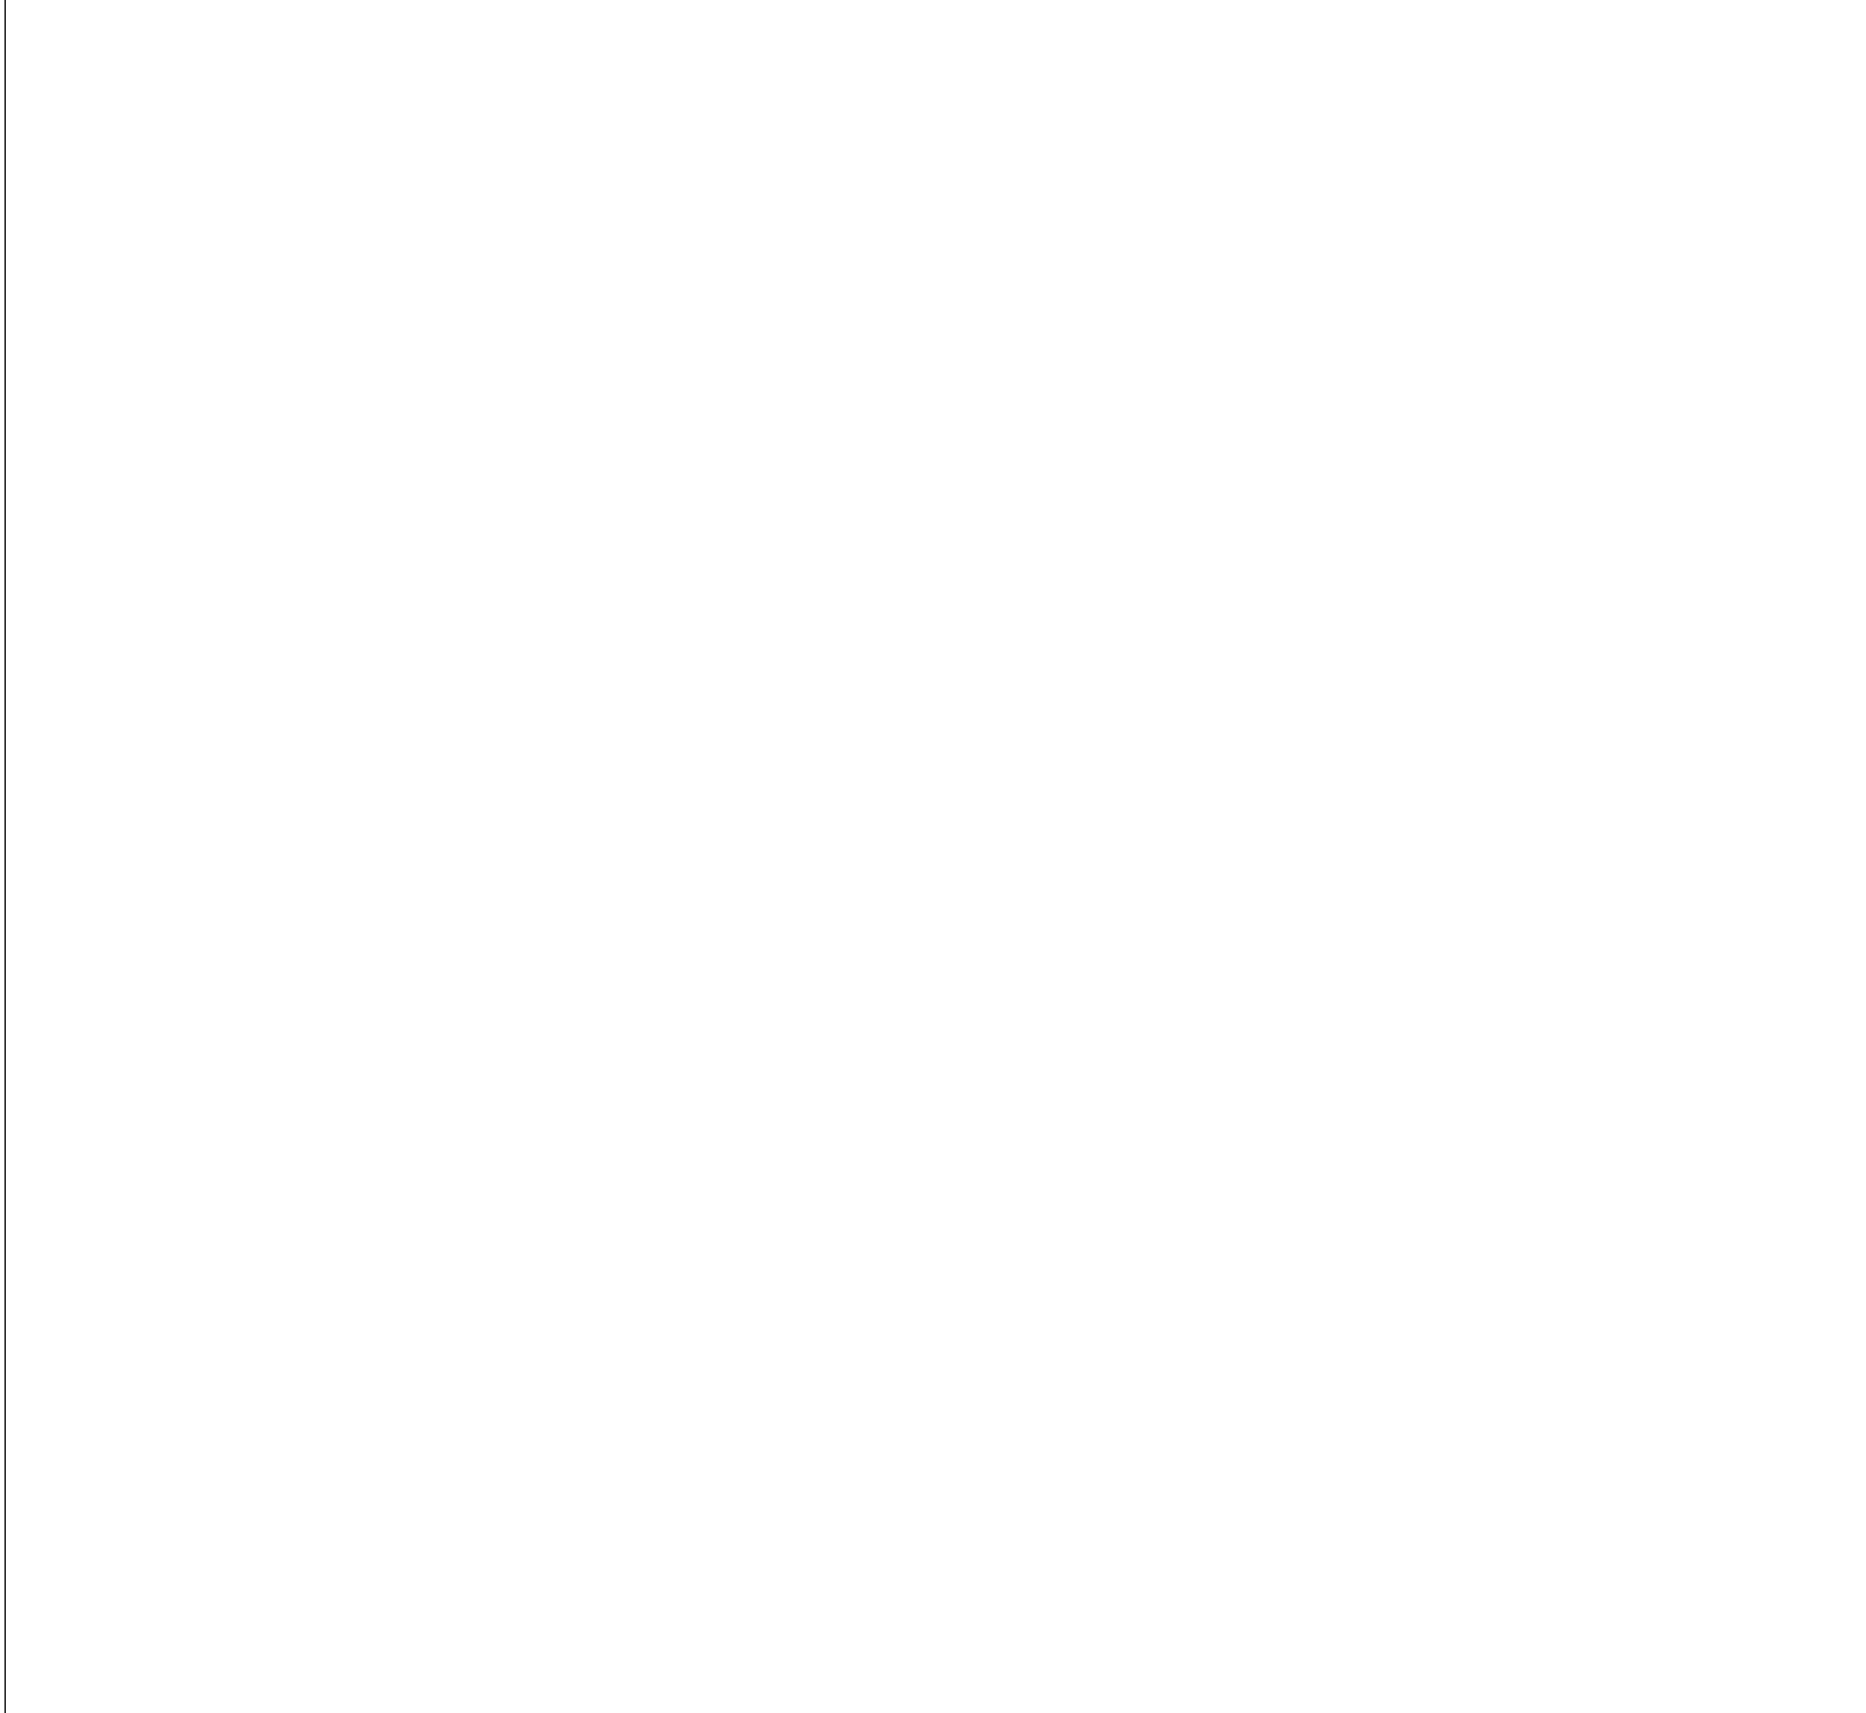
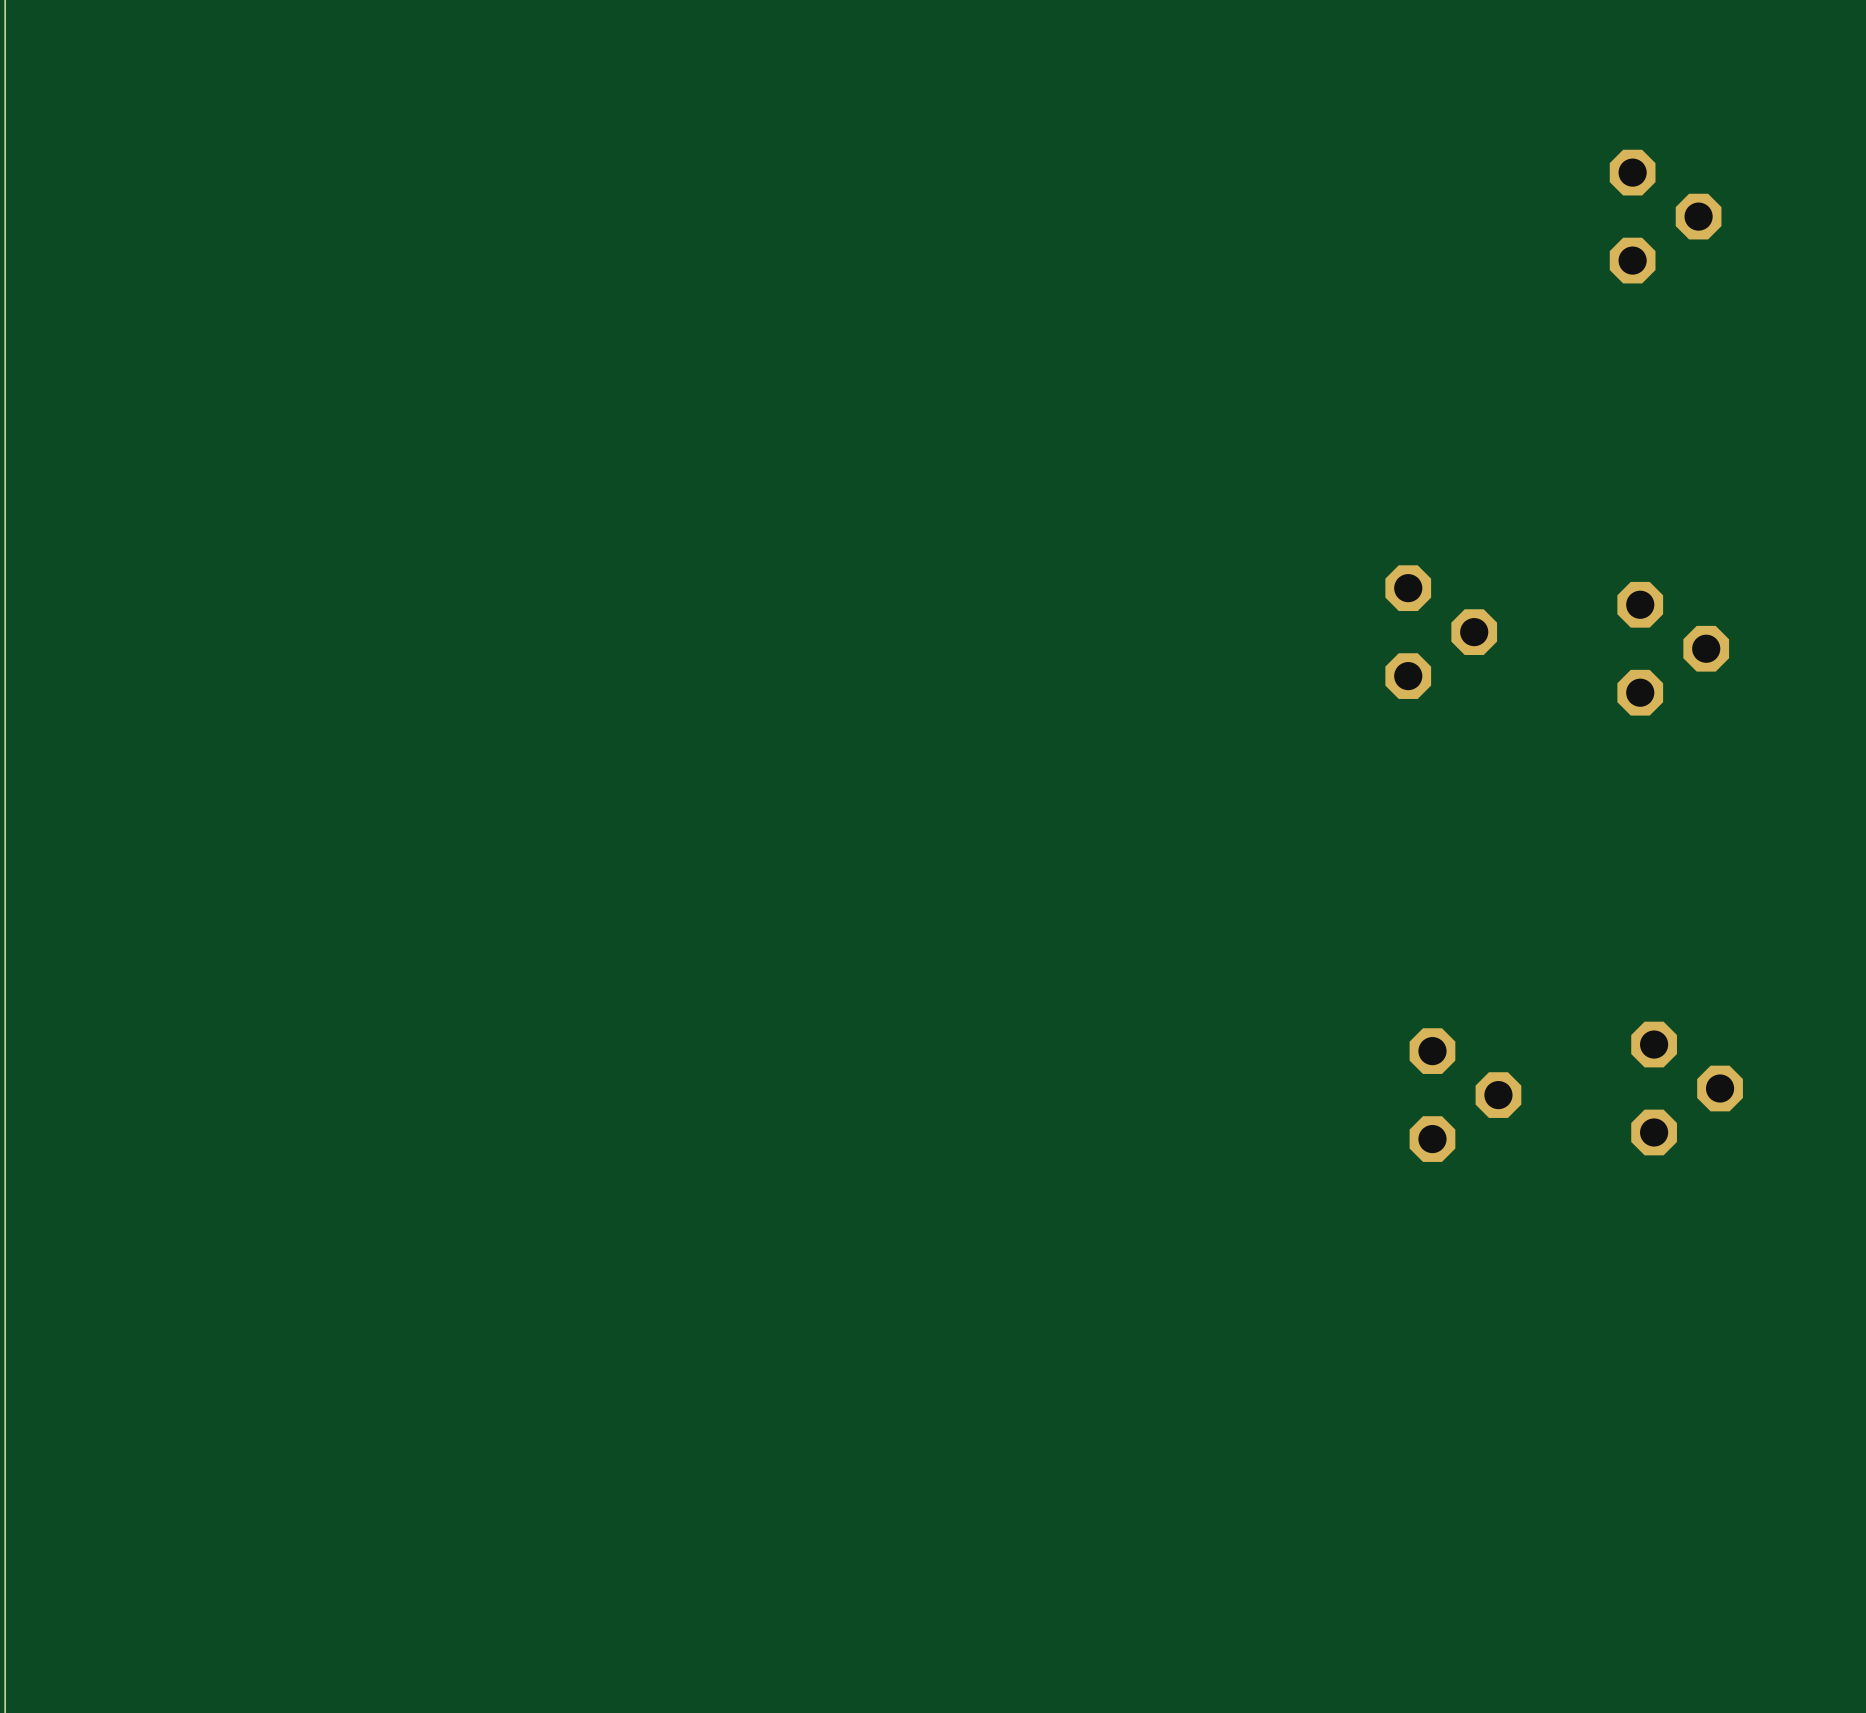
part: none -> (1665, 216)
part: none -> (1441, 632)
part: none -> (1673, 648)
part: none -> (1687, 1088)
part: none -> (1465, 1095)

